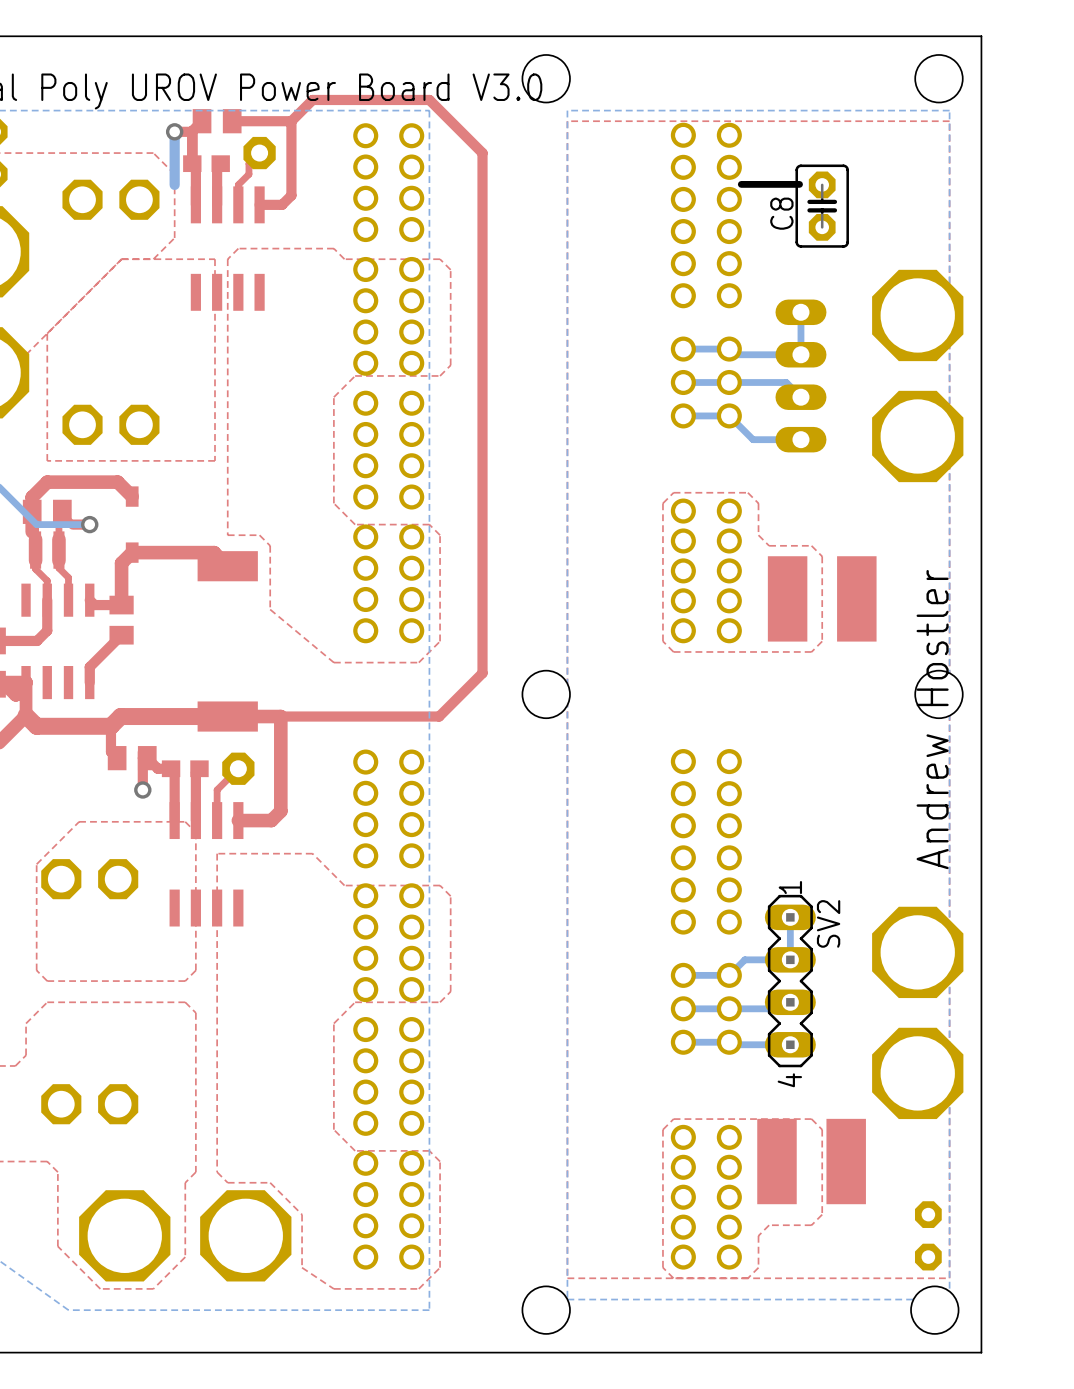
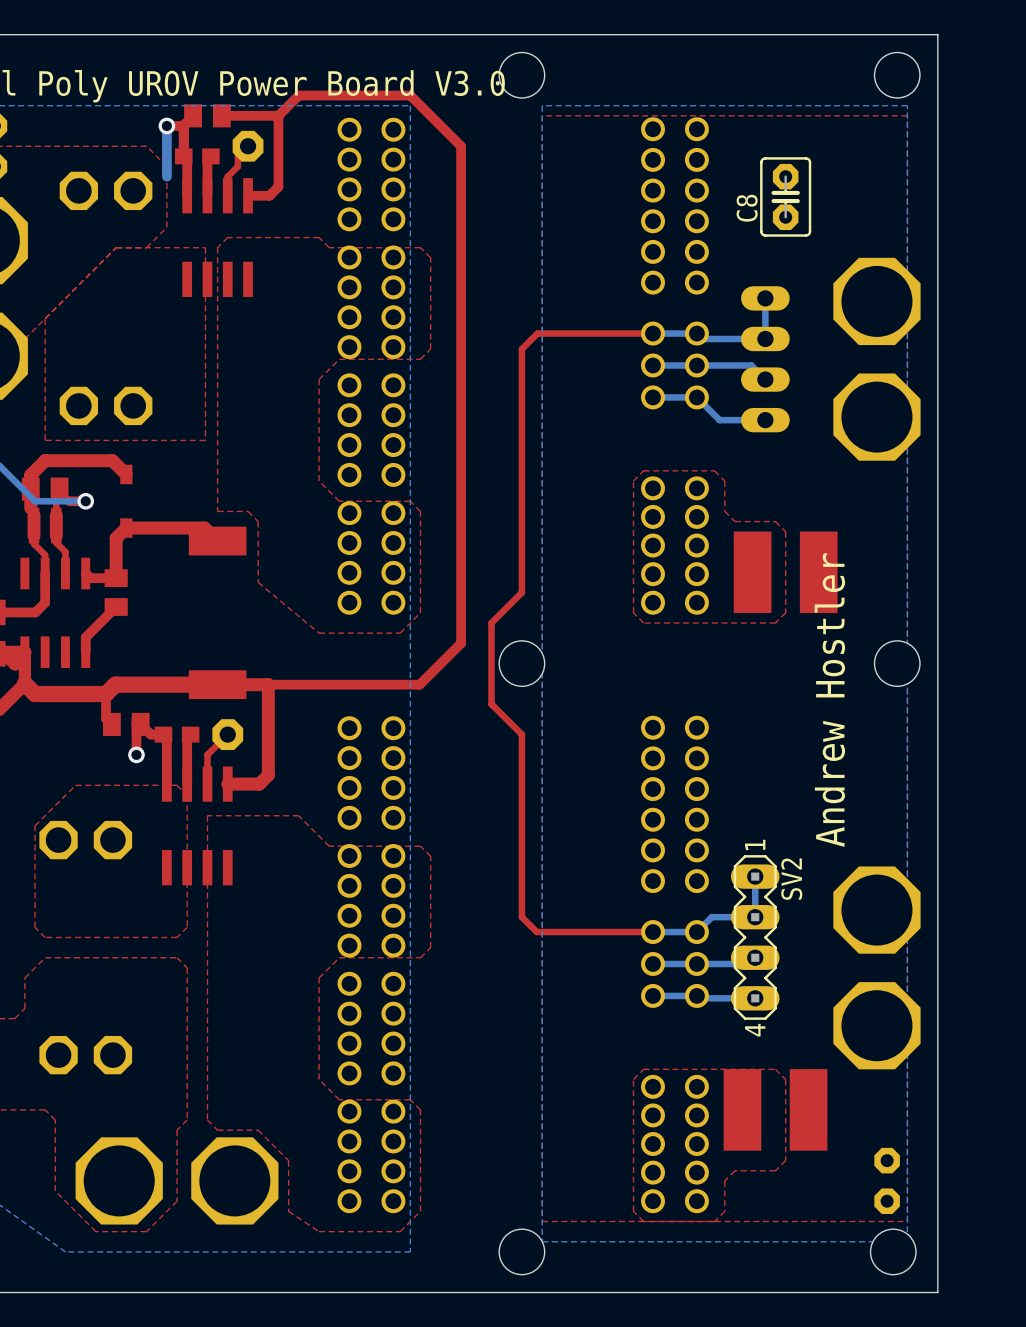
text: - (770, 184) -> none
top track: none -> (653, 333) (537, 333) (521, 349) (521, 592) (491, 623) (491, 704) (521, 734) (521, 917) (536, 932) (653, 932)
text position: Andrew Hostler (932, 719) -> Andrew Hostler (829, 700)

